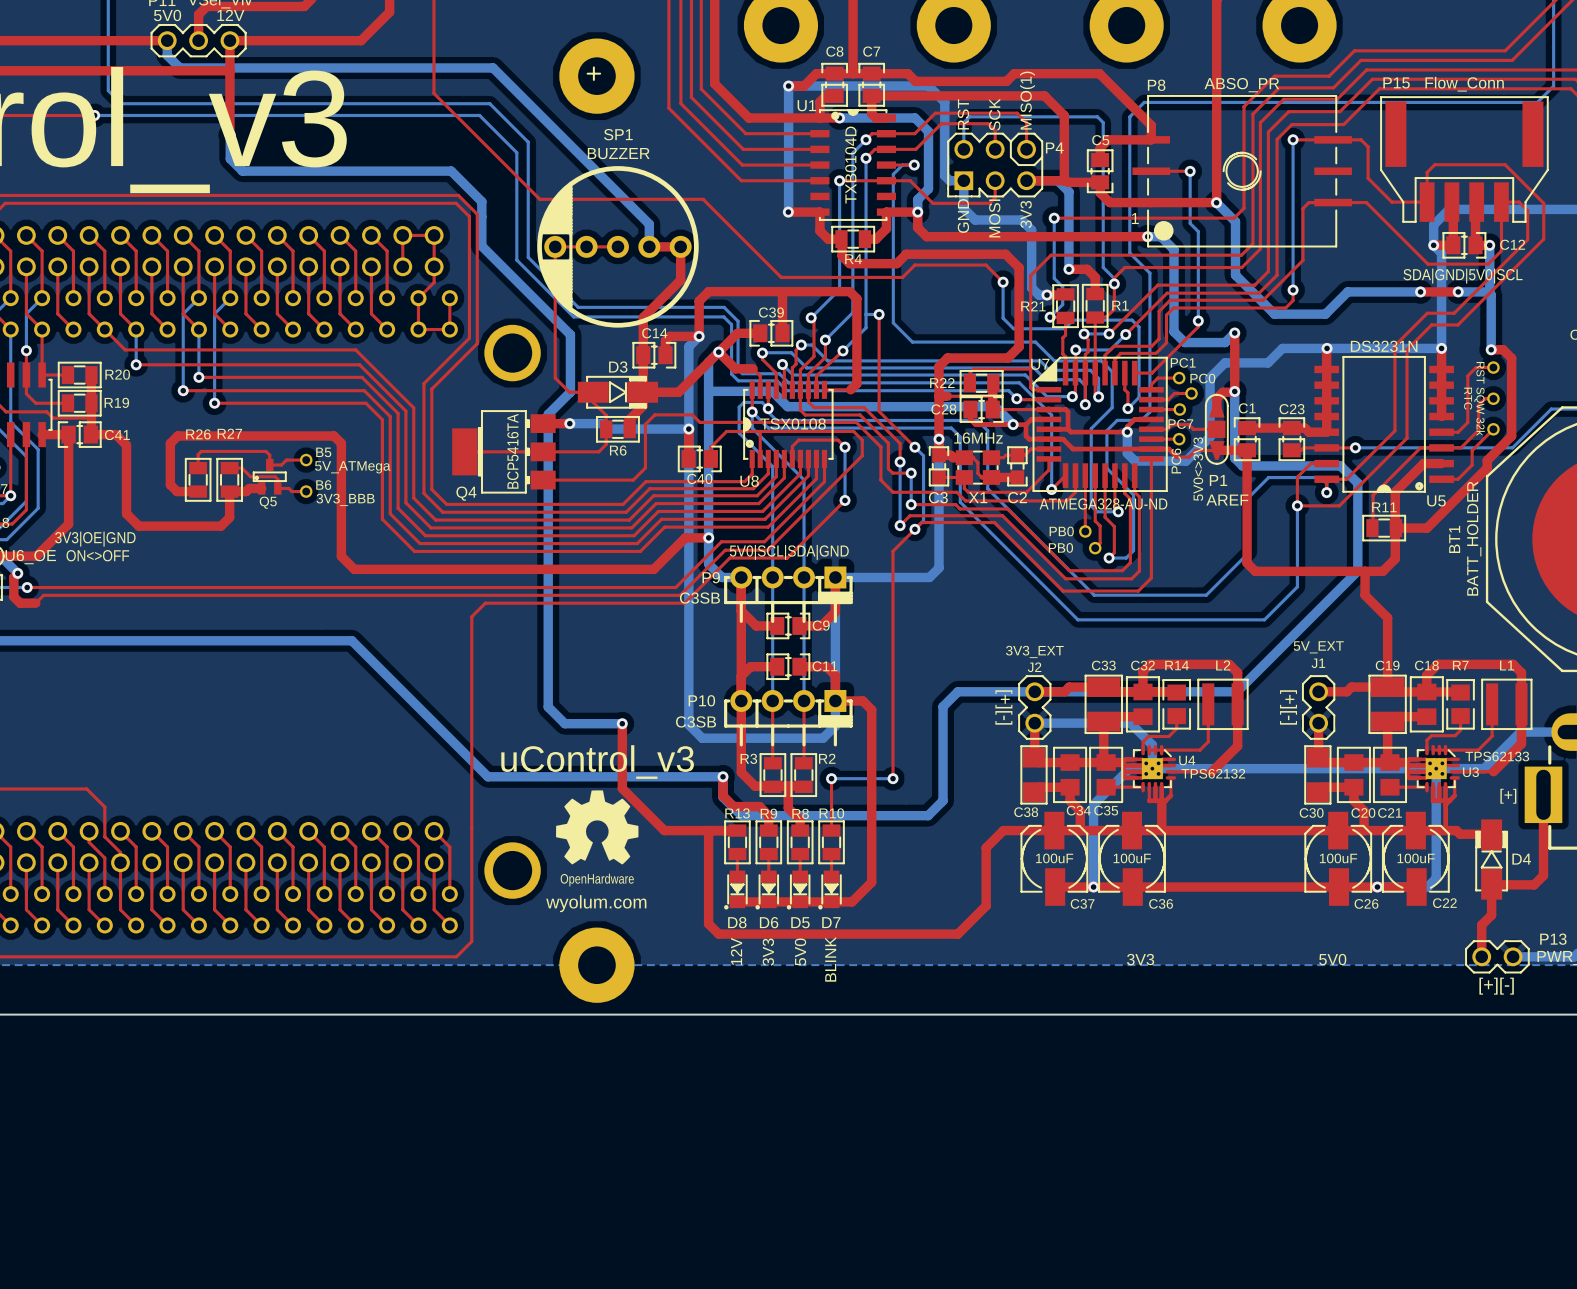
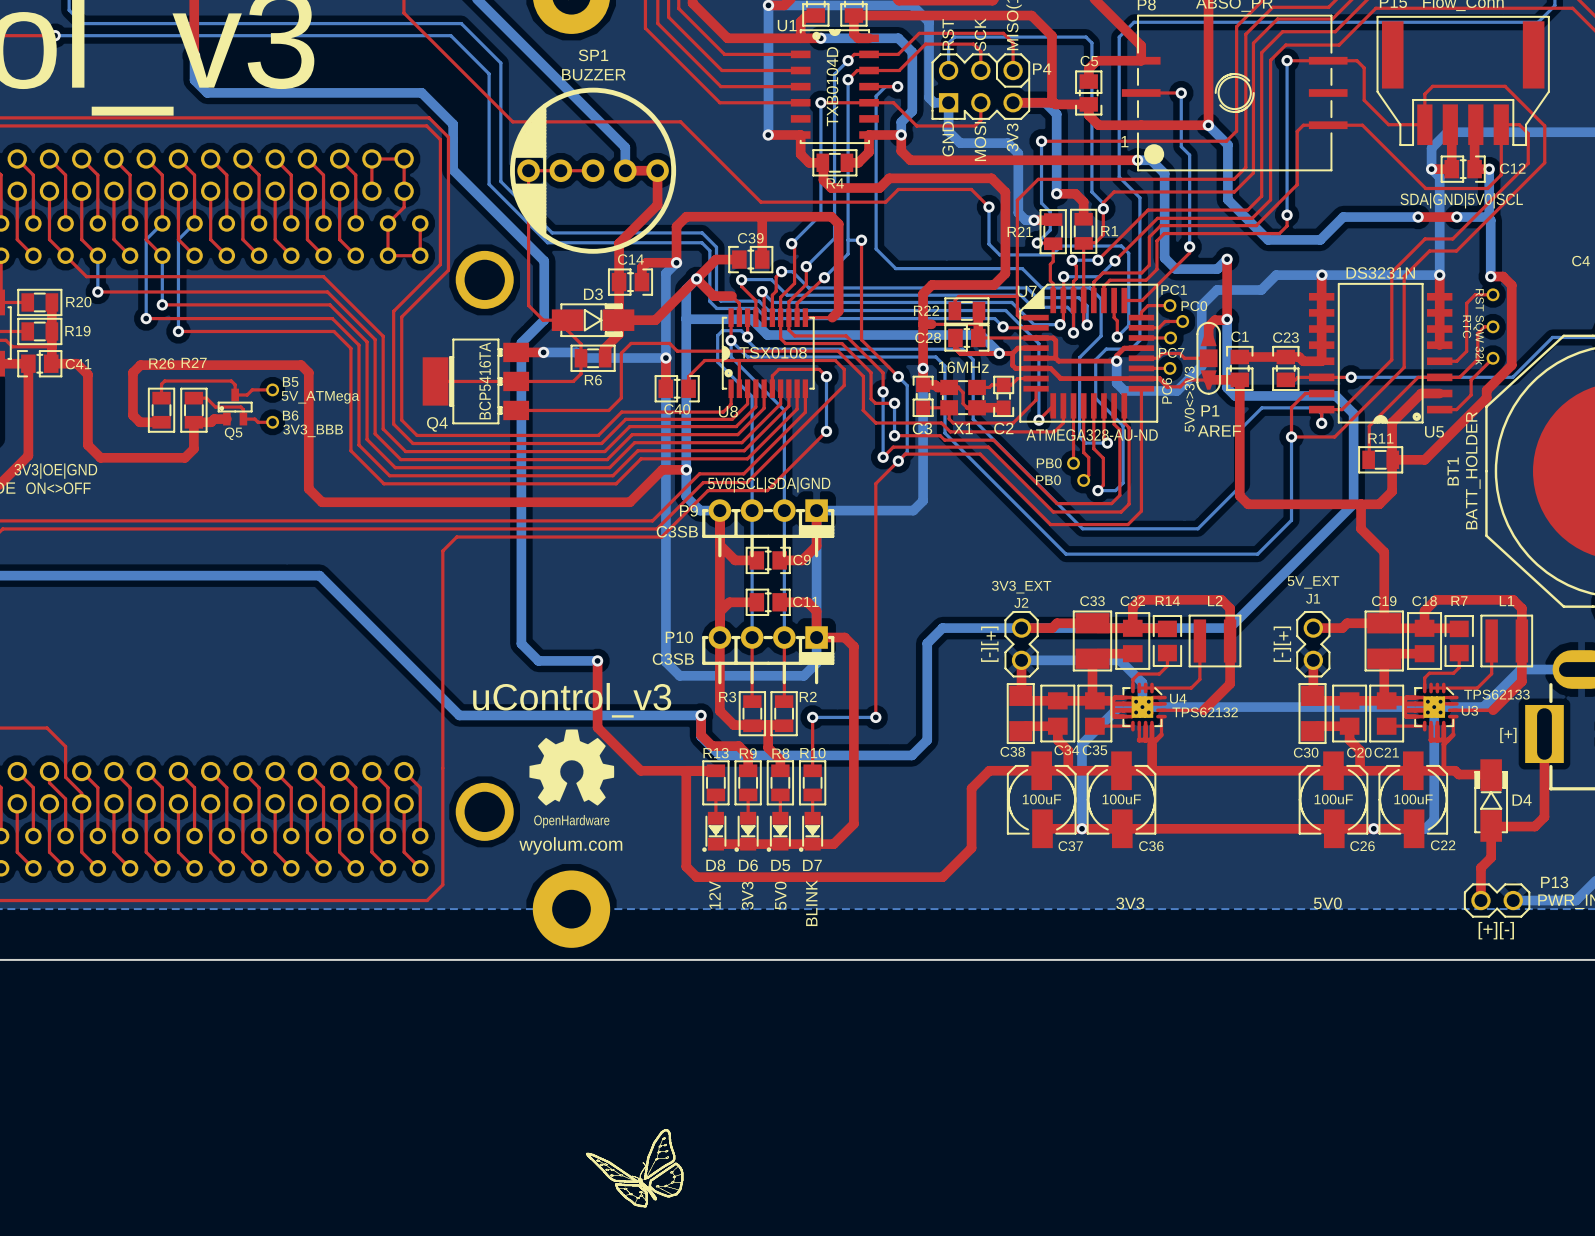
drawing: none -> [585, 1129, 684, 1208]

